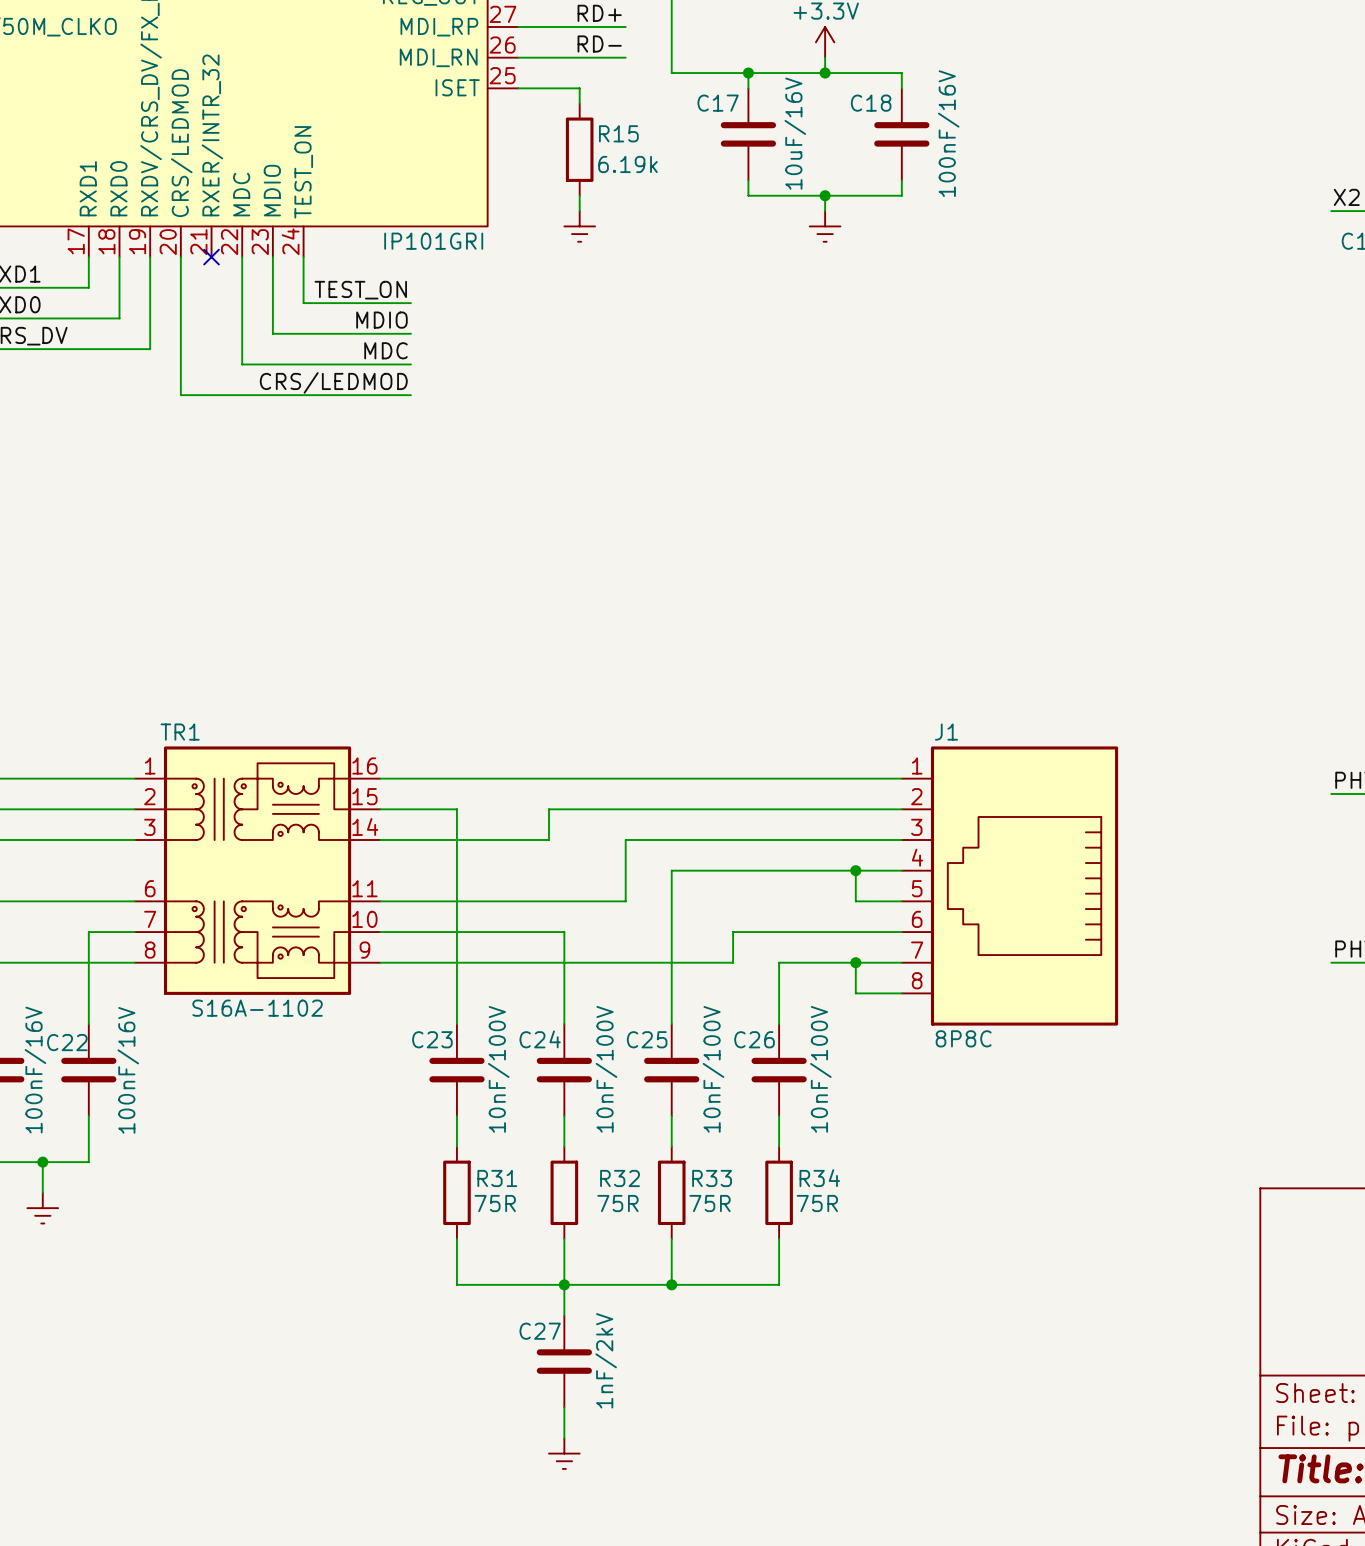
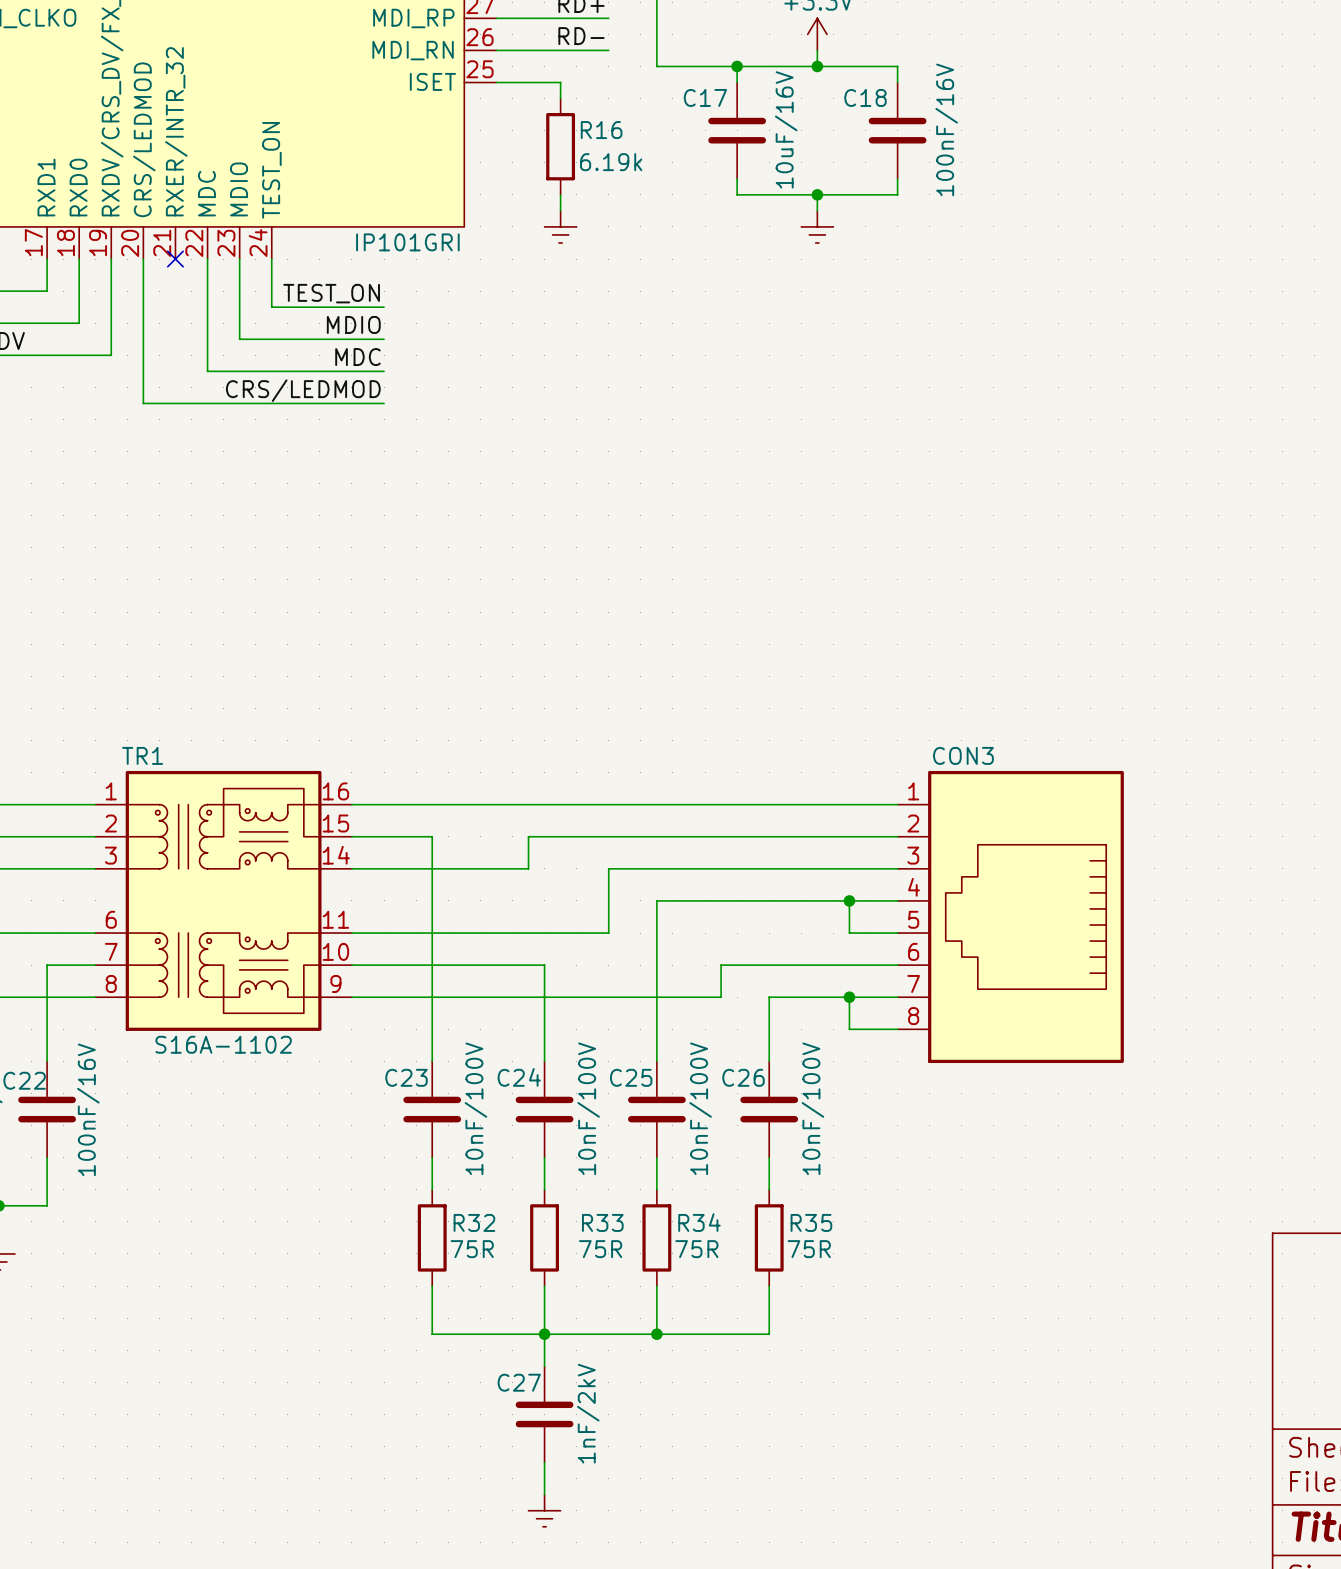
R15 name: R15 (618, 133) -> R16 (601, 130)
J1 name: J1 (946, 732) -> CON3 (963, 755)
J1 value: 8P8C (963, 1038) -> none
R31 name: R31 (497, 1178) -> R32 (474, 1222)
R32 name: R32 (620, 1178) -> R33 (602, 1222)
R33 name: R33 (712, 1178) -> R34 (699, 1222)
R34 name: R34 (819, 1178) -> R35 (811, 1222)

